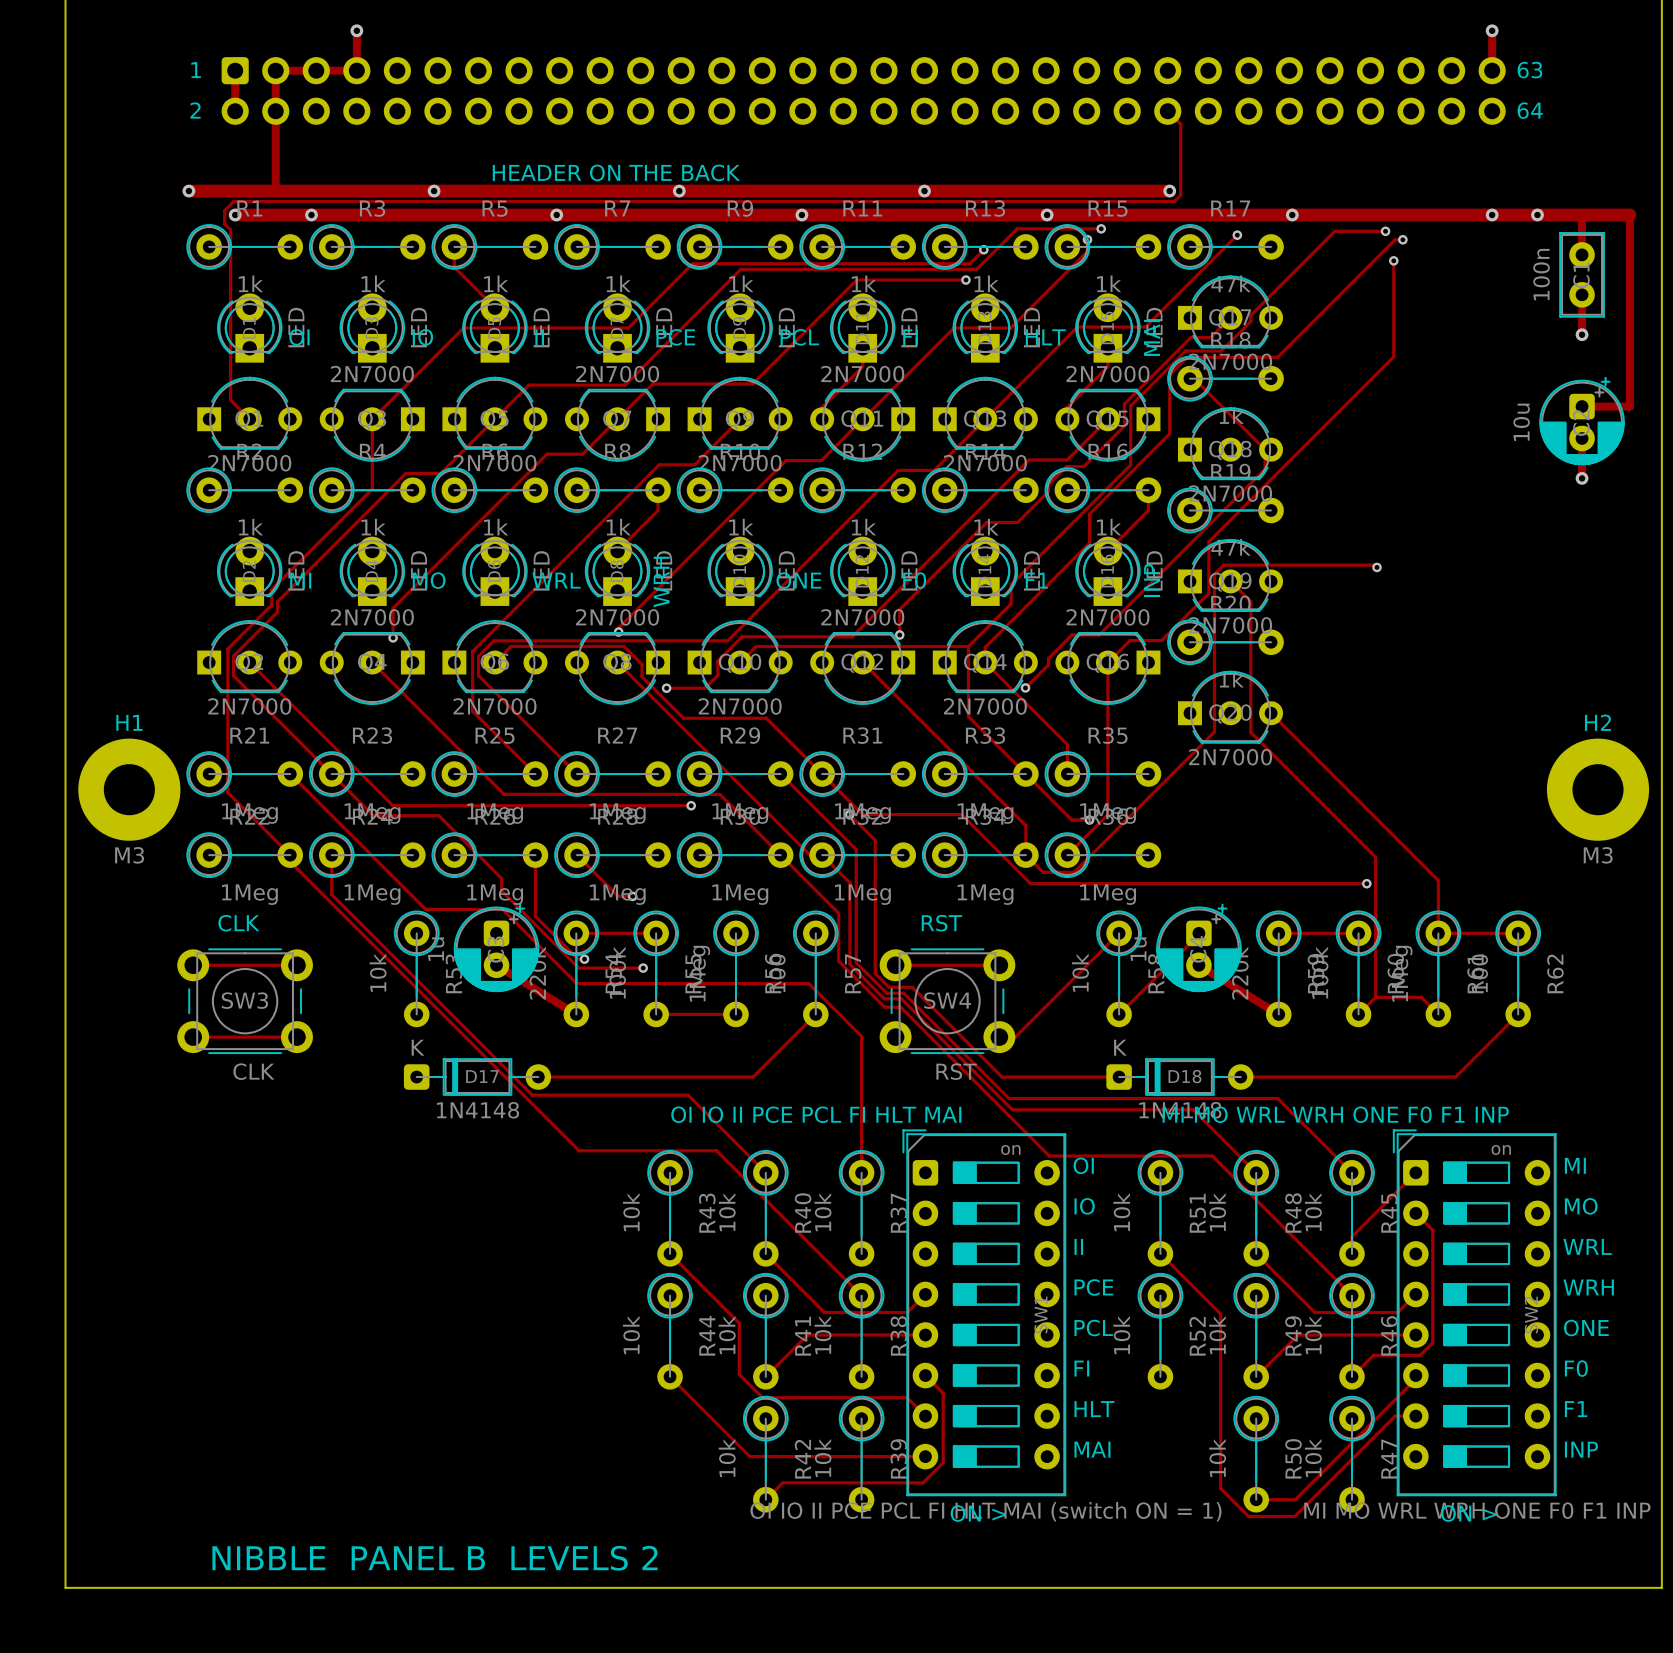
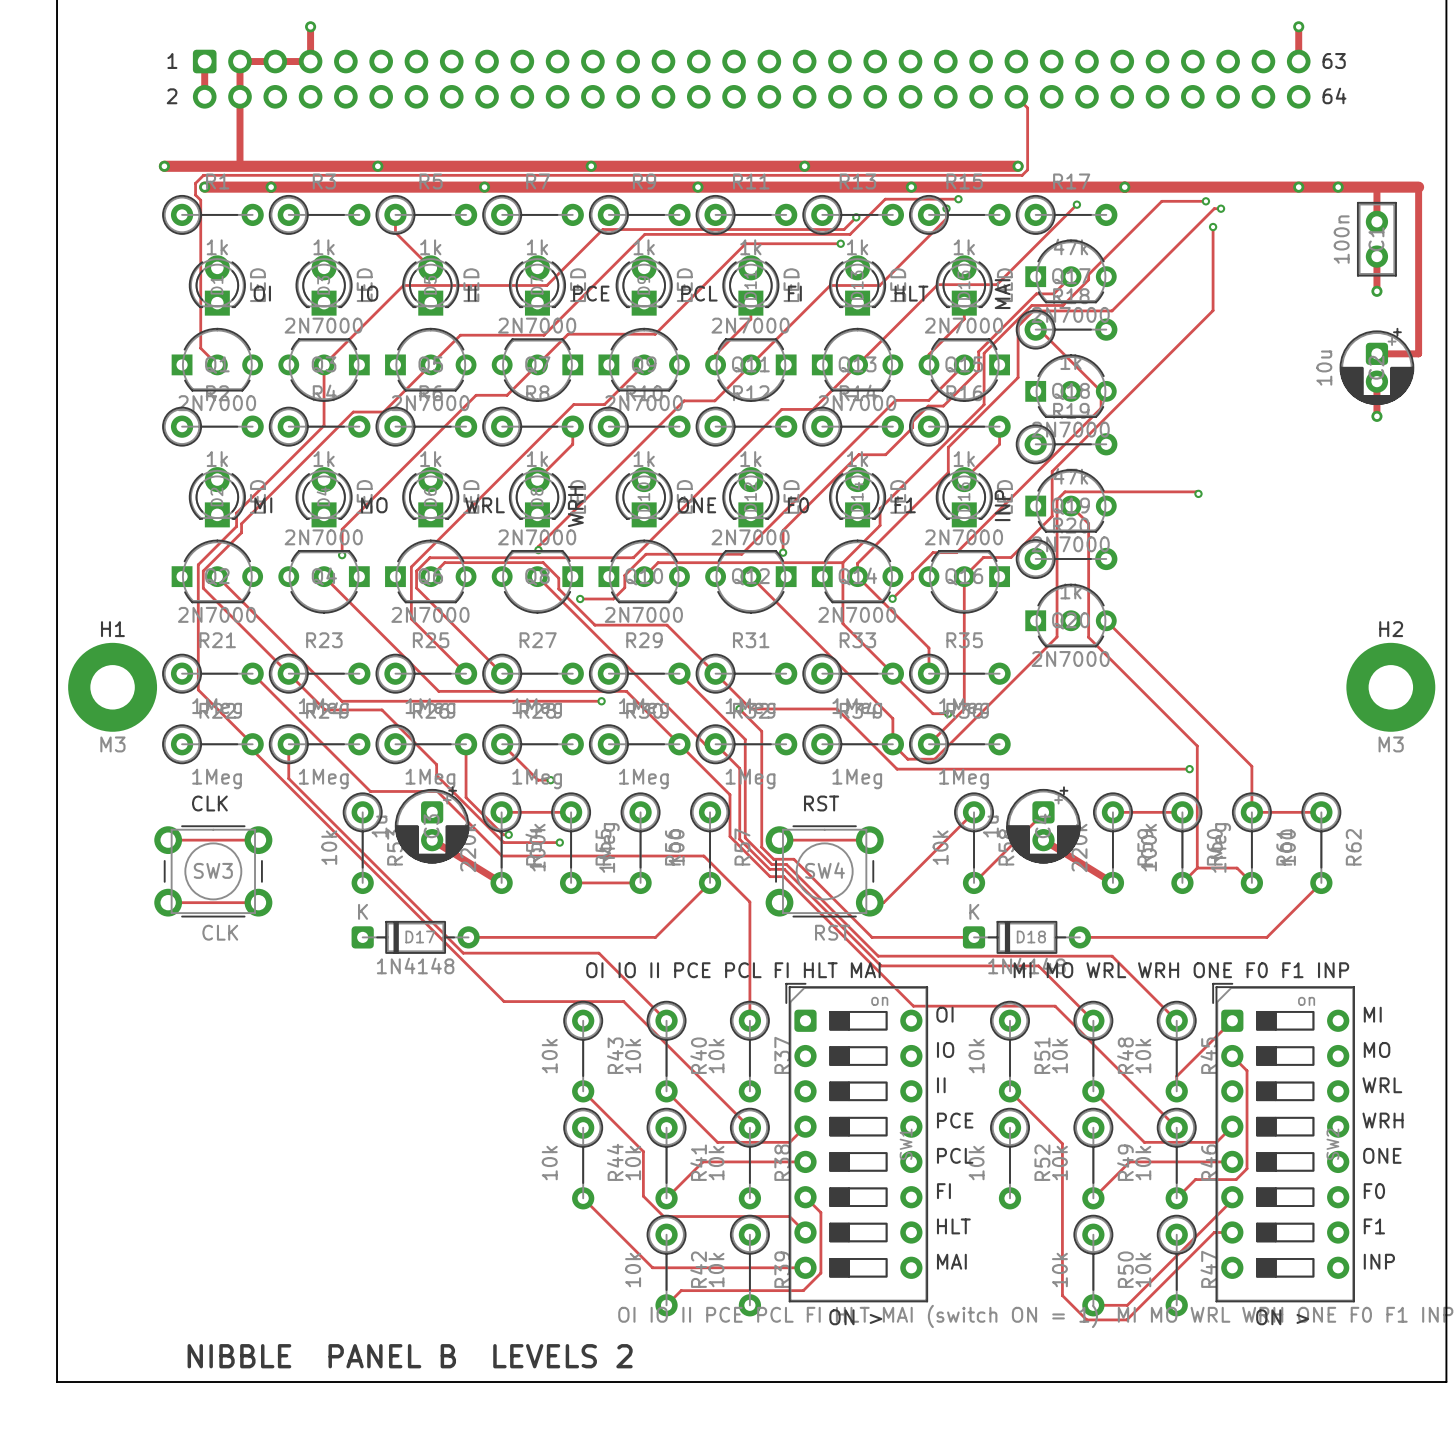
text: HEADER ON THE BACK (616, 172) -> none

